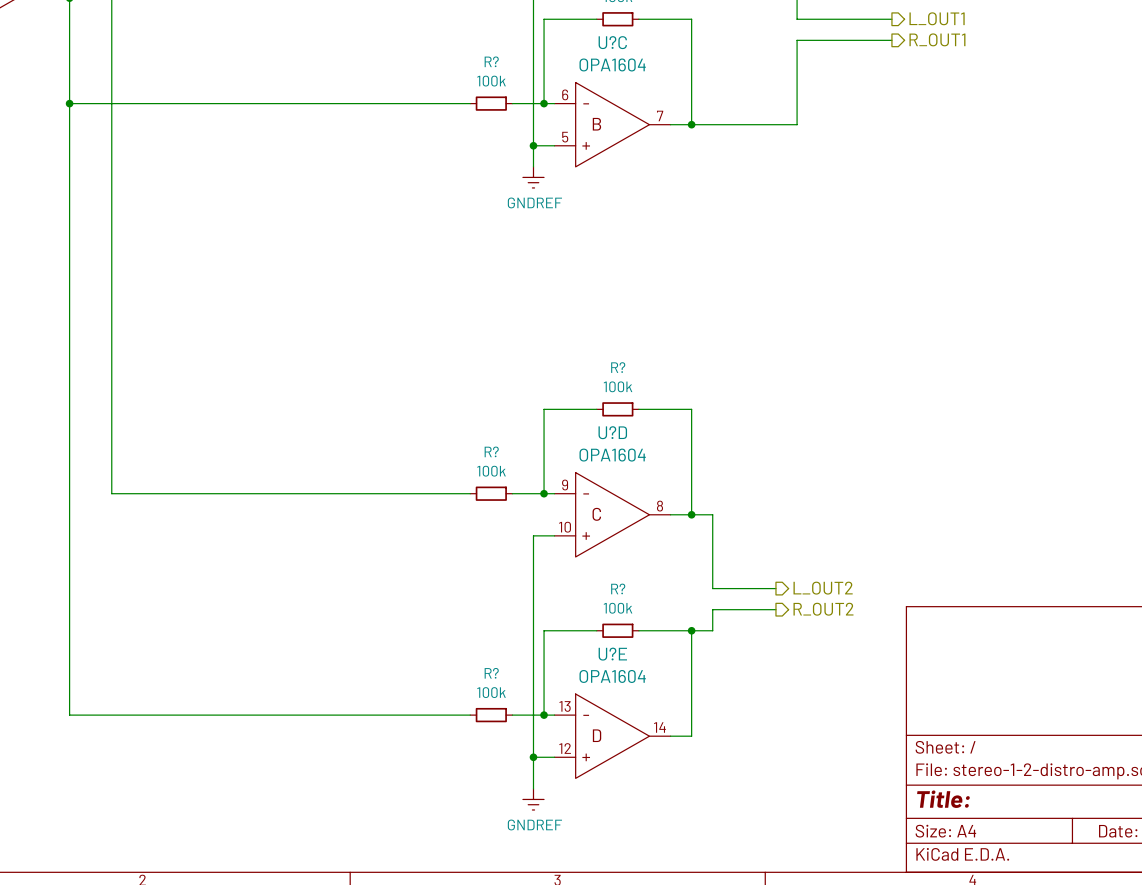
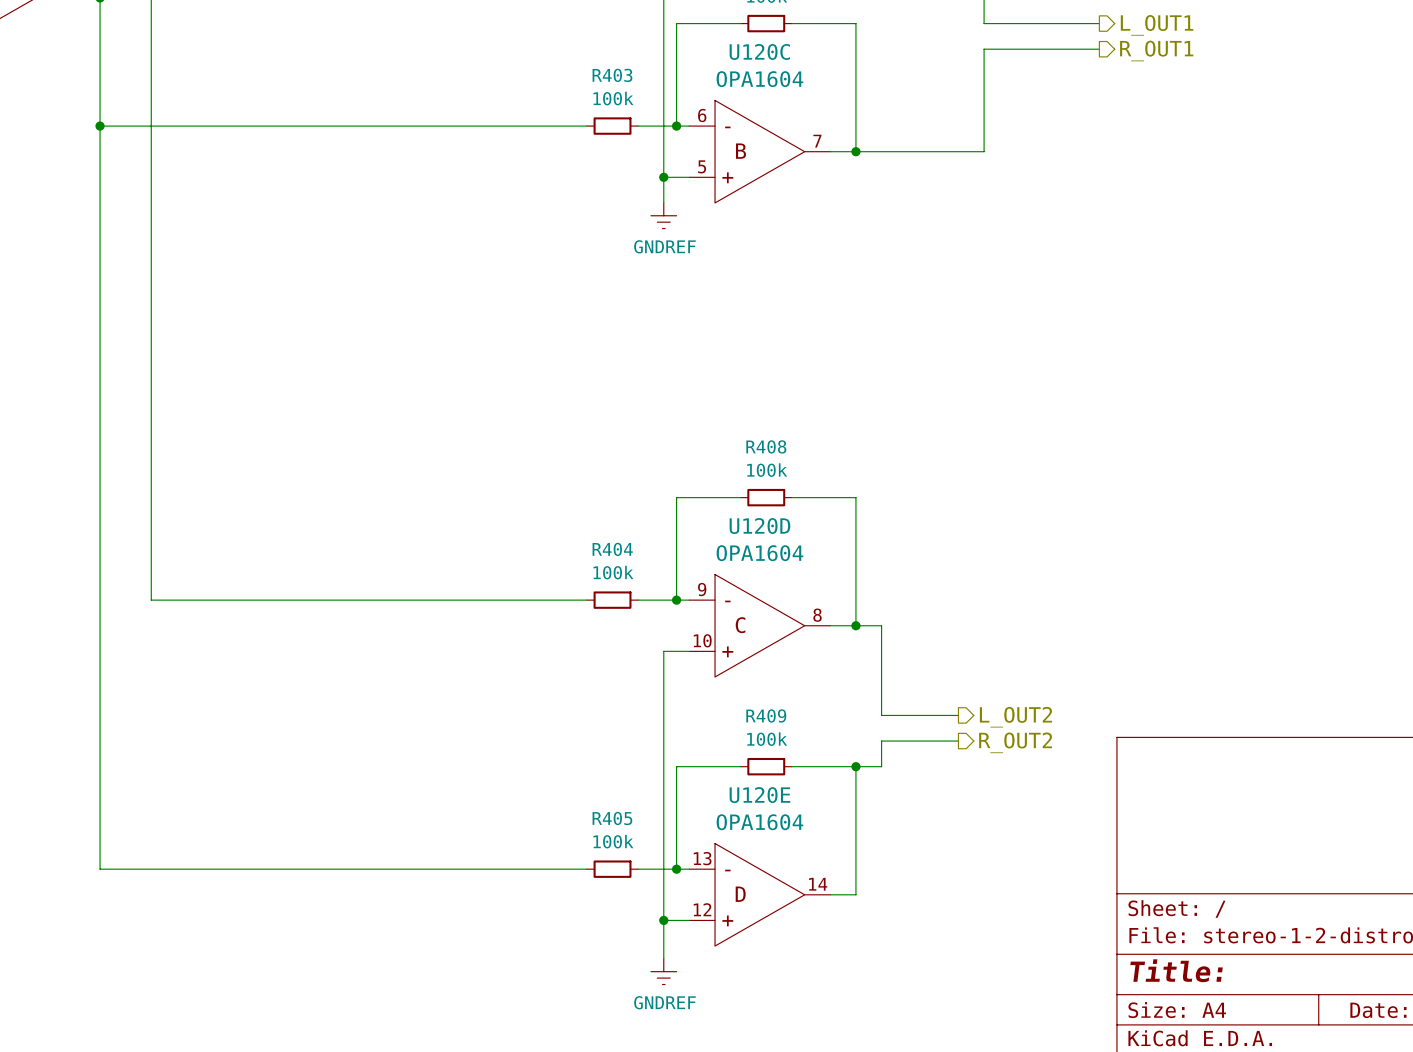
U?C name: U?C (612, 42) -> U120C (759, 51)
R? name: R? (491, 61) -> R403 (612, 75)
R? name: R? (618, 367) -> R408 (766, 446)
U?D name: U?D (612, 432) -> U120D (759, 526)
R? name: R? (491, 451) -> R404 (612, 549)
R? name: R? (618, 588) -> R409 (766, 715)
U?E name: U?E (612, 654) -> U120E (759, 795)
R? name: R? (491, 673) -> R405 (612, 818)

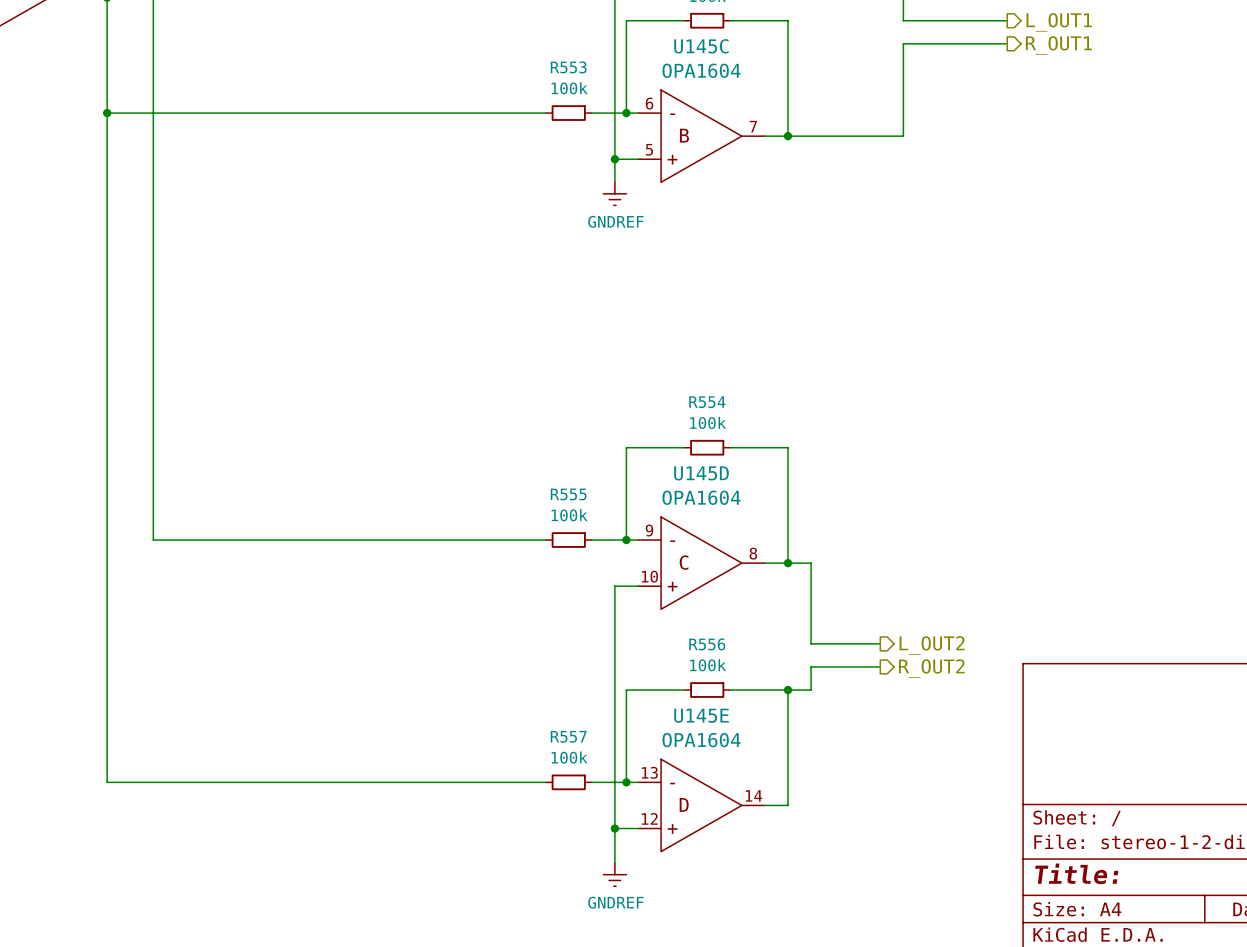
U120C name: U120C (759, 51) -> U145C (701, 46)
R403 name: R403 (612, 75) -> R553 (568, 67)
R408 name: R408 (766, 446) -> R554 (707, 402)
U120D name: U120D (759, 526) -> U145D (701, 473)
R404 name: R404 (612, 549) -> R555 (568, 494)
R409 name: R409 (766, 715) -> R556 (707, 644)
U120E name: U120E (759, 795) -> U145E (701, 715)
R405 name: R405 (612, 818) -> R557 (568, 736)

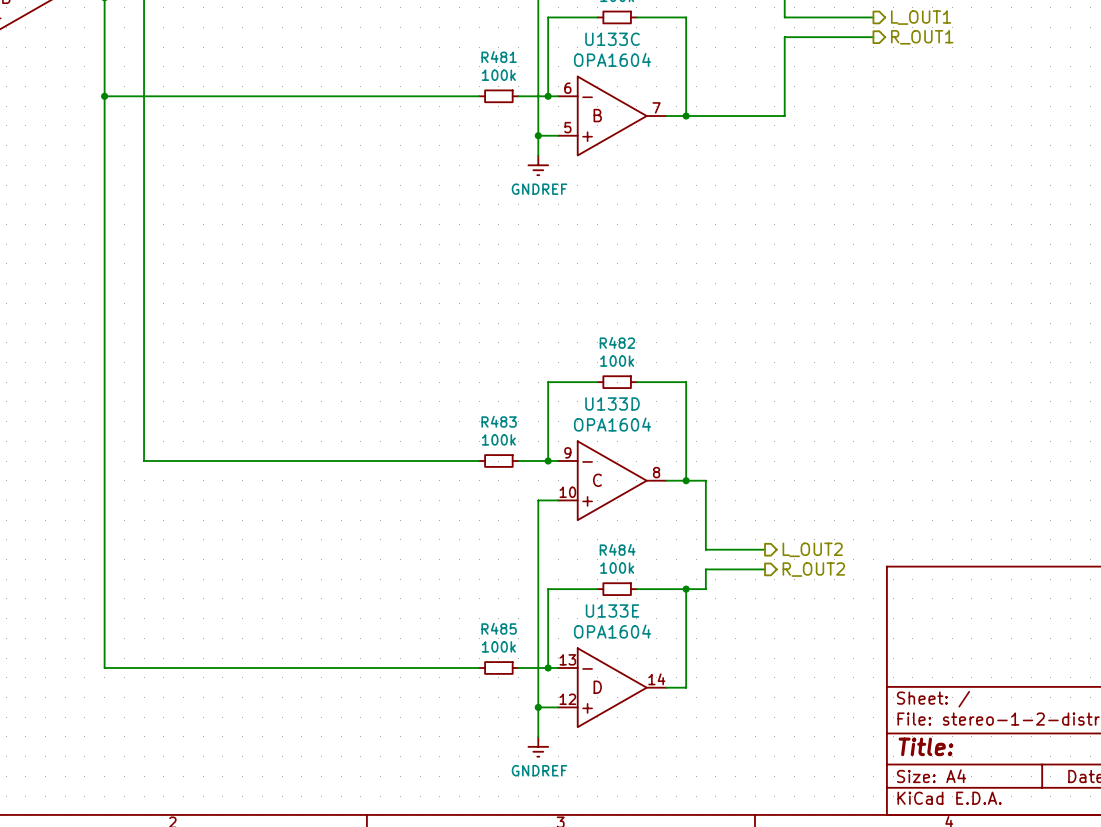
U145C name: U145C (701, 46) -> U133C (612, 39)
R553 name: R553 (568, 67) -> R481 (499, 57)
R554 name: R554 (707, 402) -> R482 (617, 342)
U145D name: U145D (701, 473) -> U133D (612, 403)
R555 name: R555 (568, 494) -> R483 (499, 421)
R556 name: R556 (707, 644) -> R484 (617, 549)
U145E name: U145E (701, 715) -> U133E (612, 610)
R557 name: R557 (568, 736) -> R485 (499, 628)

